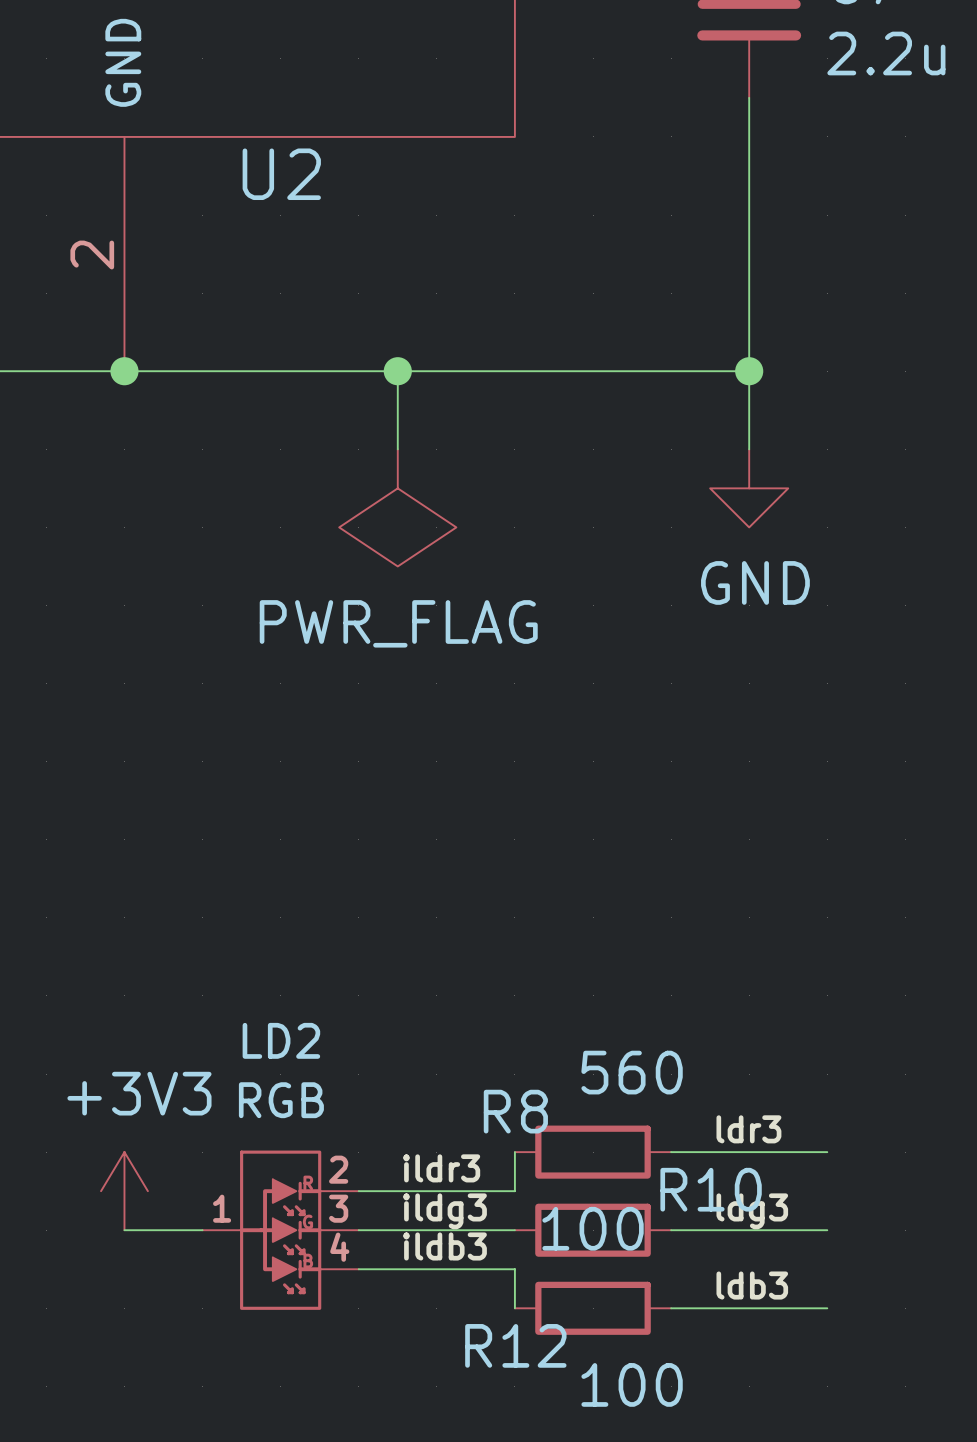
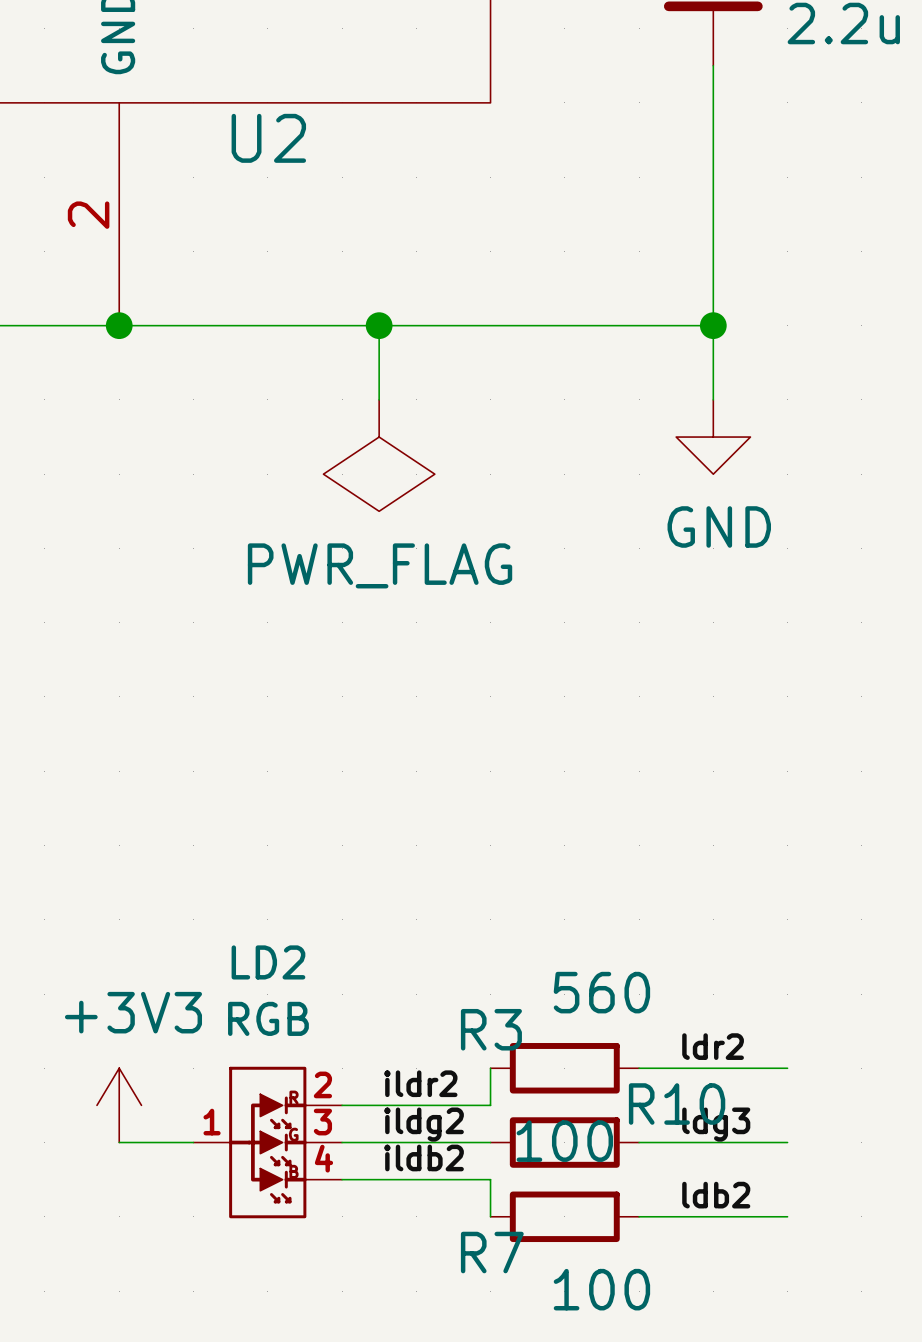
R8 name: R8 (515, 1111) -> R3 (491, 1029)
label: ldr3 (748, 1129) -> ldr2 (713, 1046)
label: ildr3 (441, 1168) -> ildr2 (420, 1083)
label: ildg3 (444, 1211) -> ildg2 (423, 1124)
label: ildb3 (444, 1246) -> ildb2 (423, 1157)
label: ldb3 (752, 1285) -> ldb2 (716, 1195)
R12 name: R12 (515, 1345) -> R7 (492, 1252)

